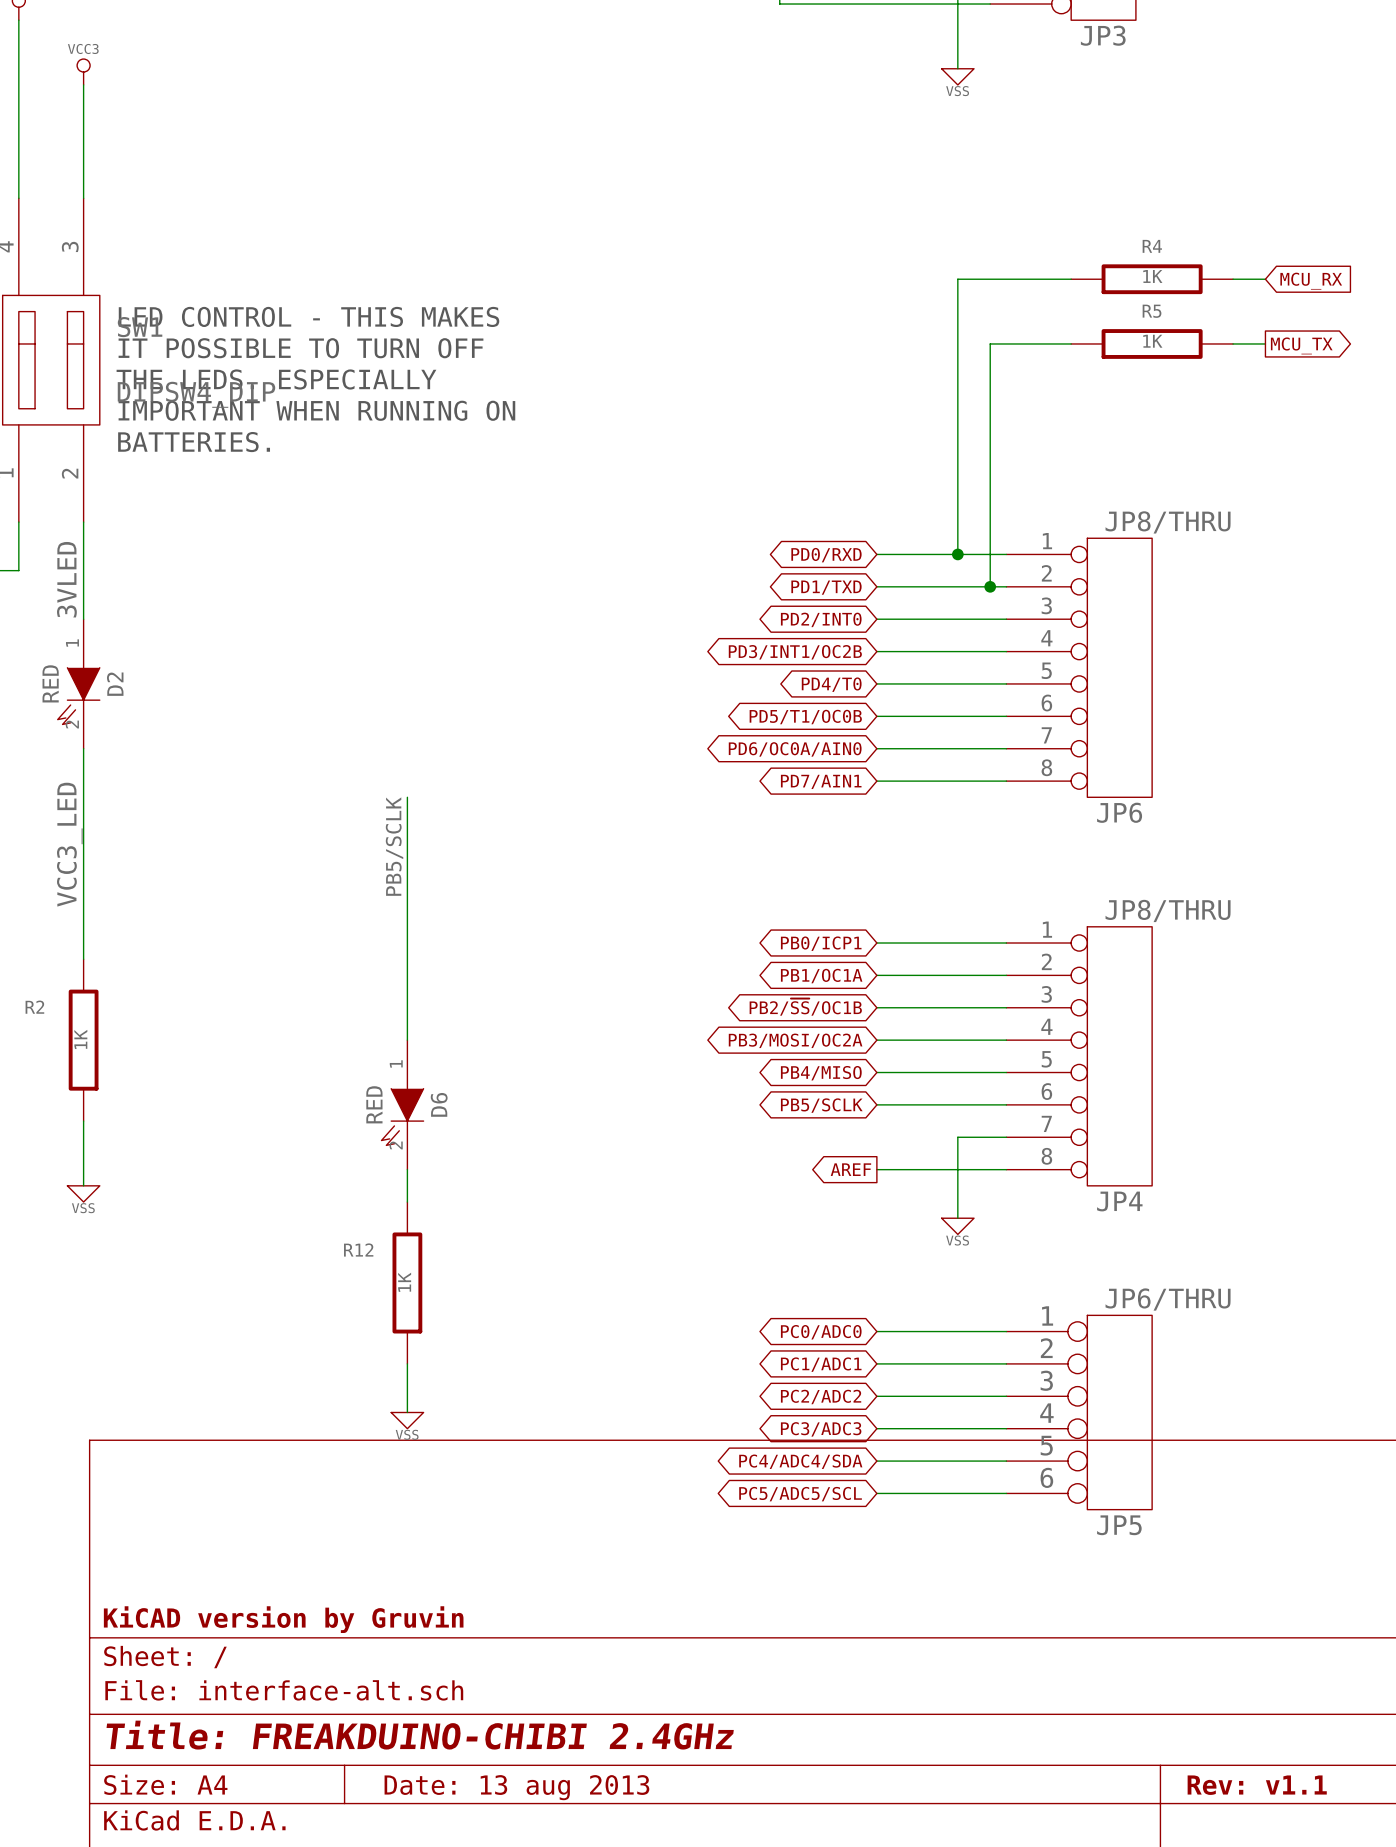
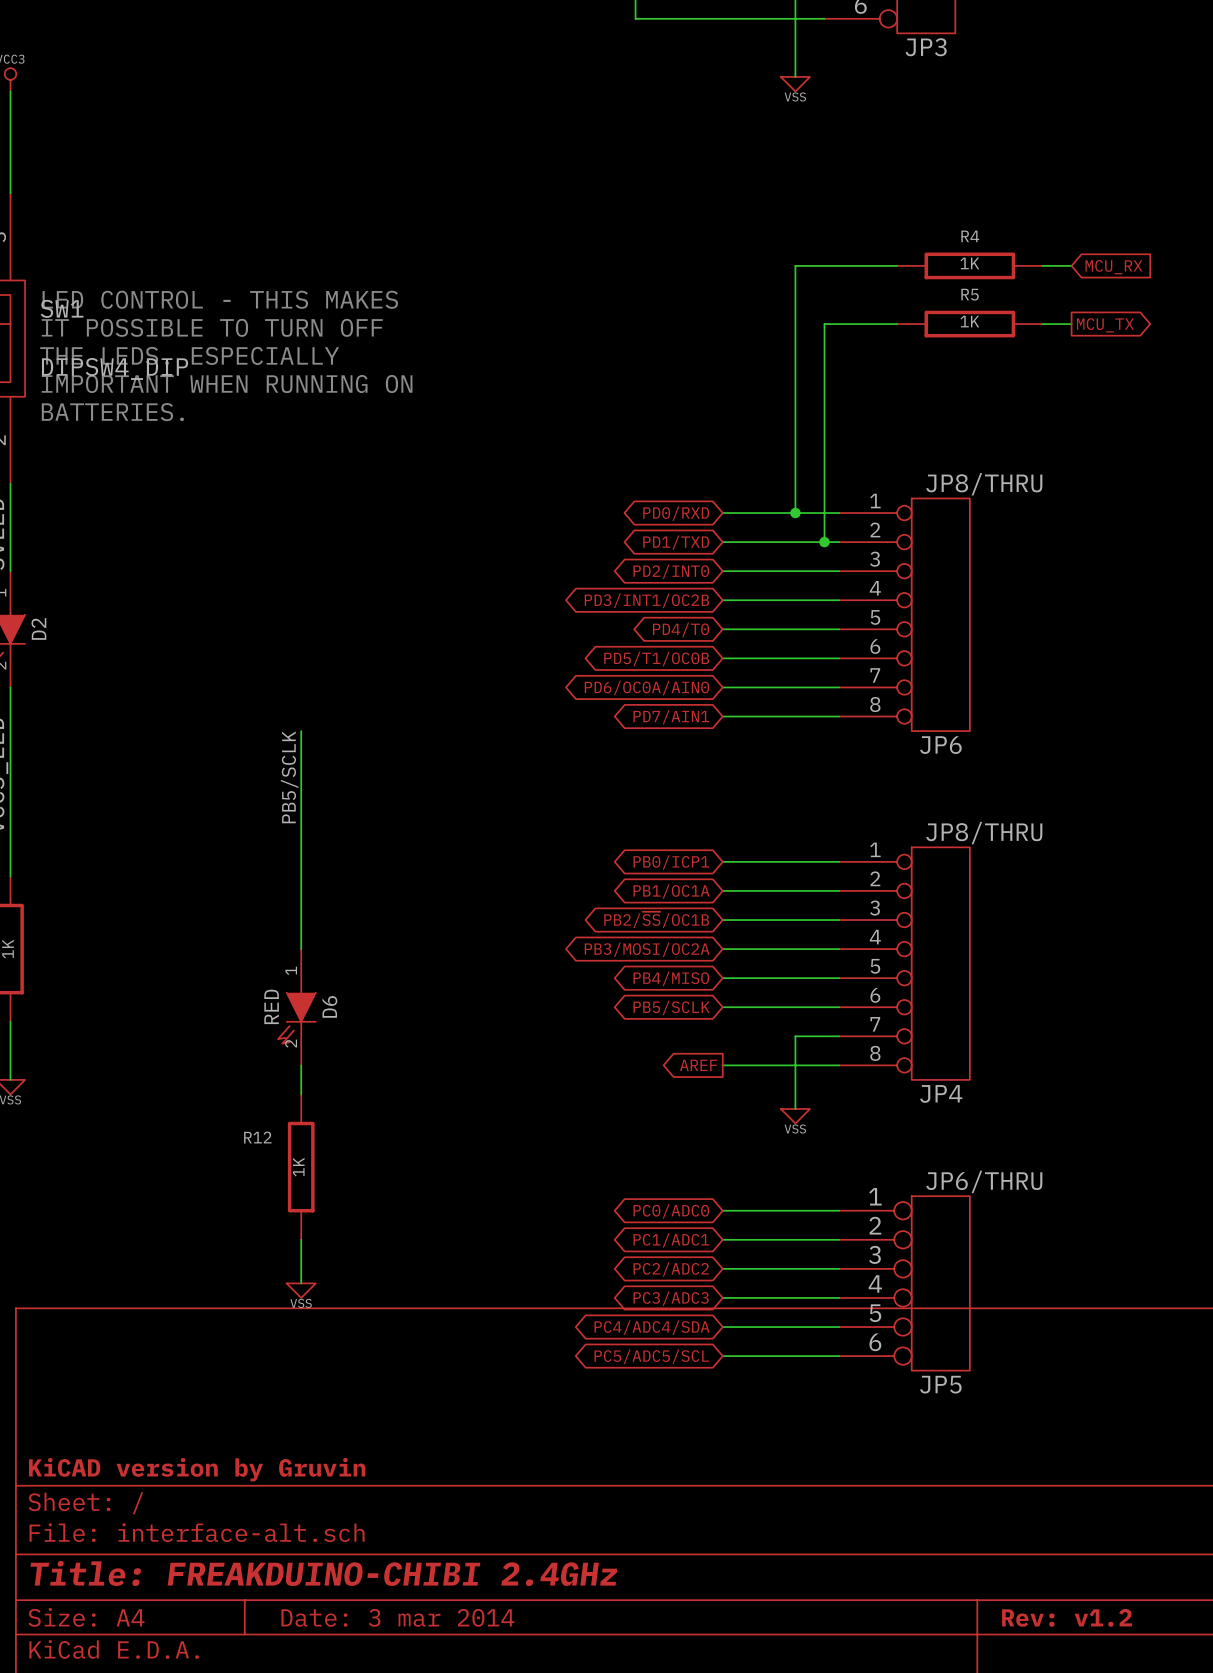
title block: Rev: v1.1 (1257, 1785) -> Rev: v1.2 (1067, 1617)
title block: Date: 13 aug 2013 (516, 1787) -> Date: 3 mar 2014 (397, 1617)

